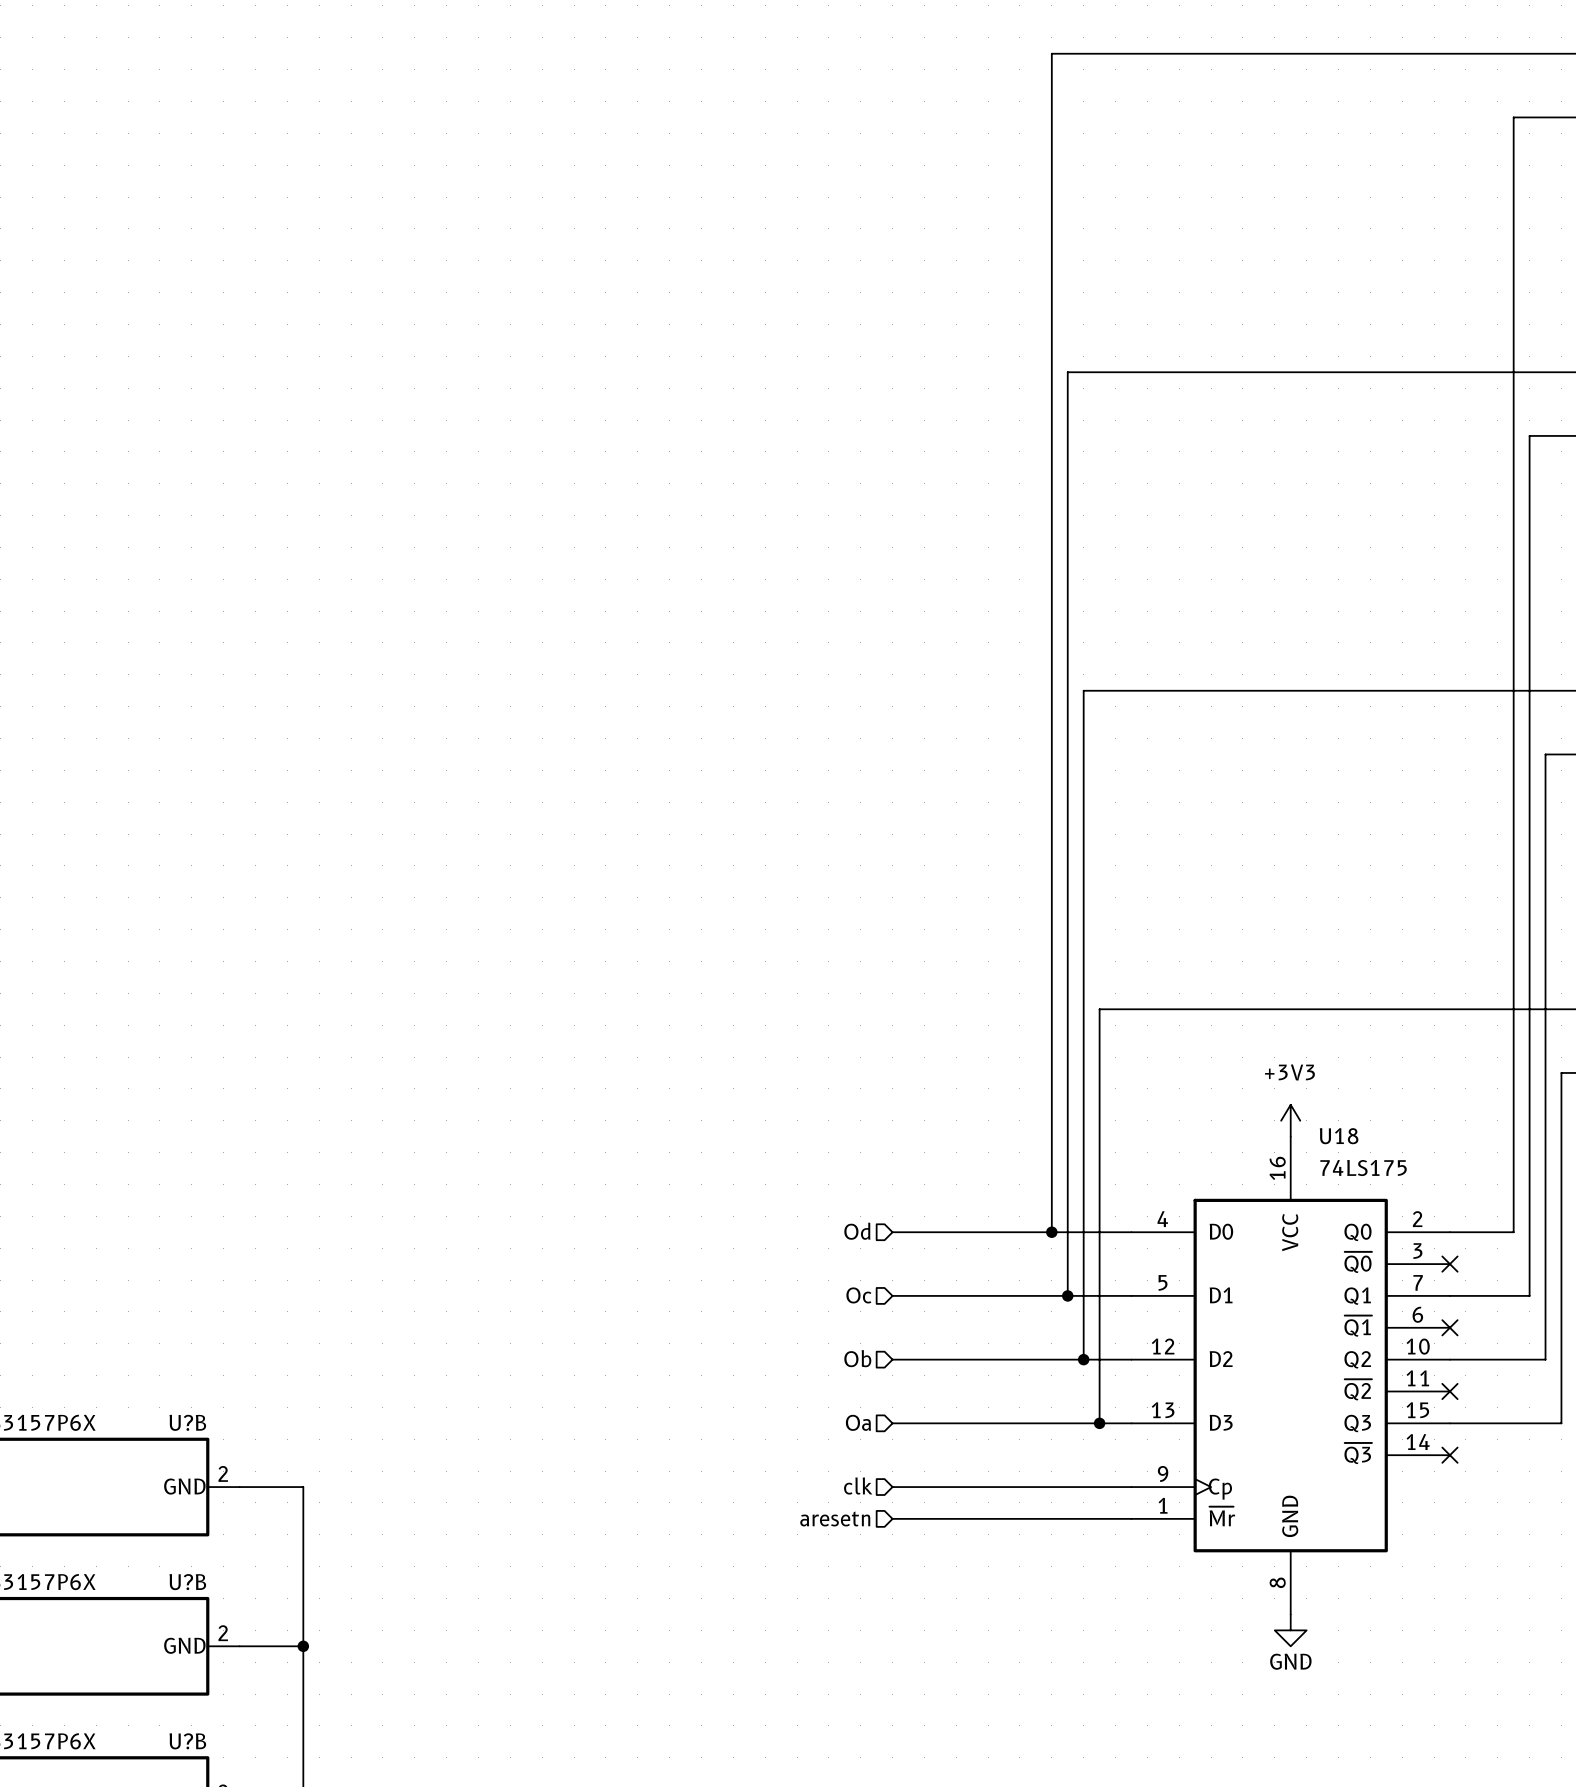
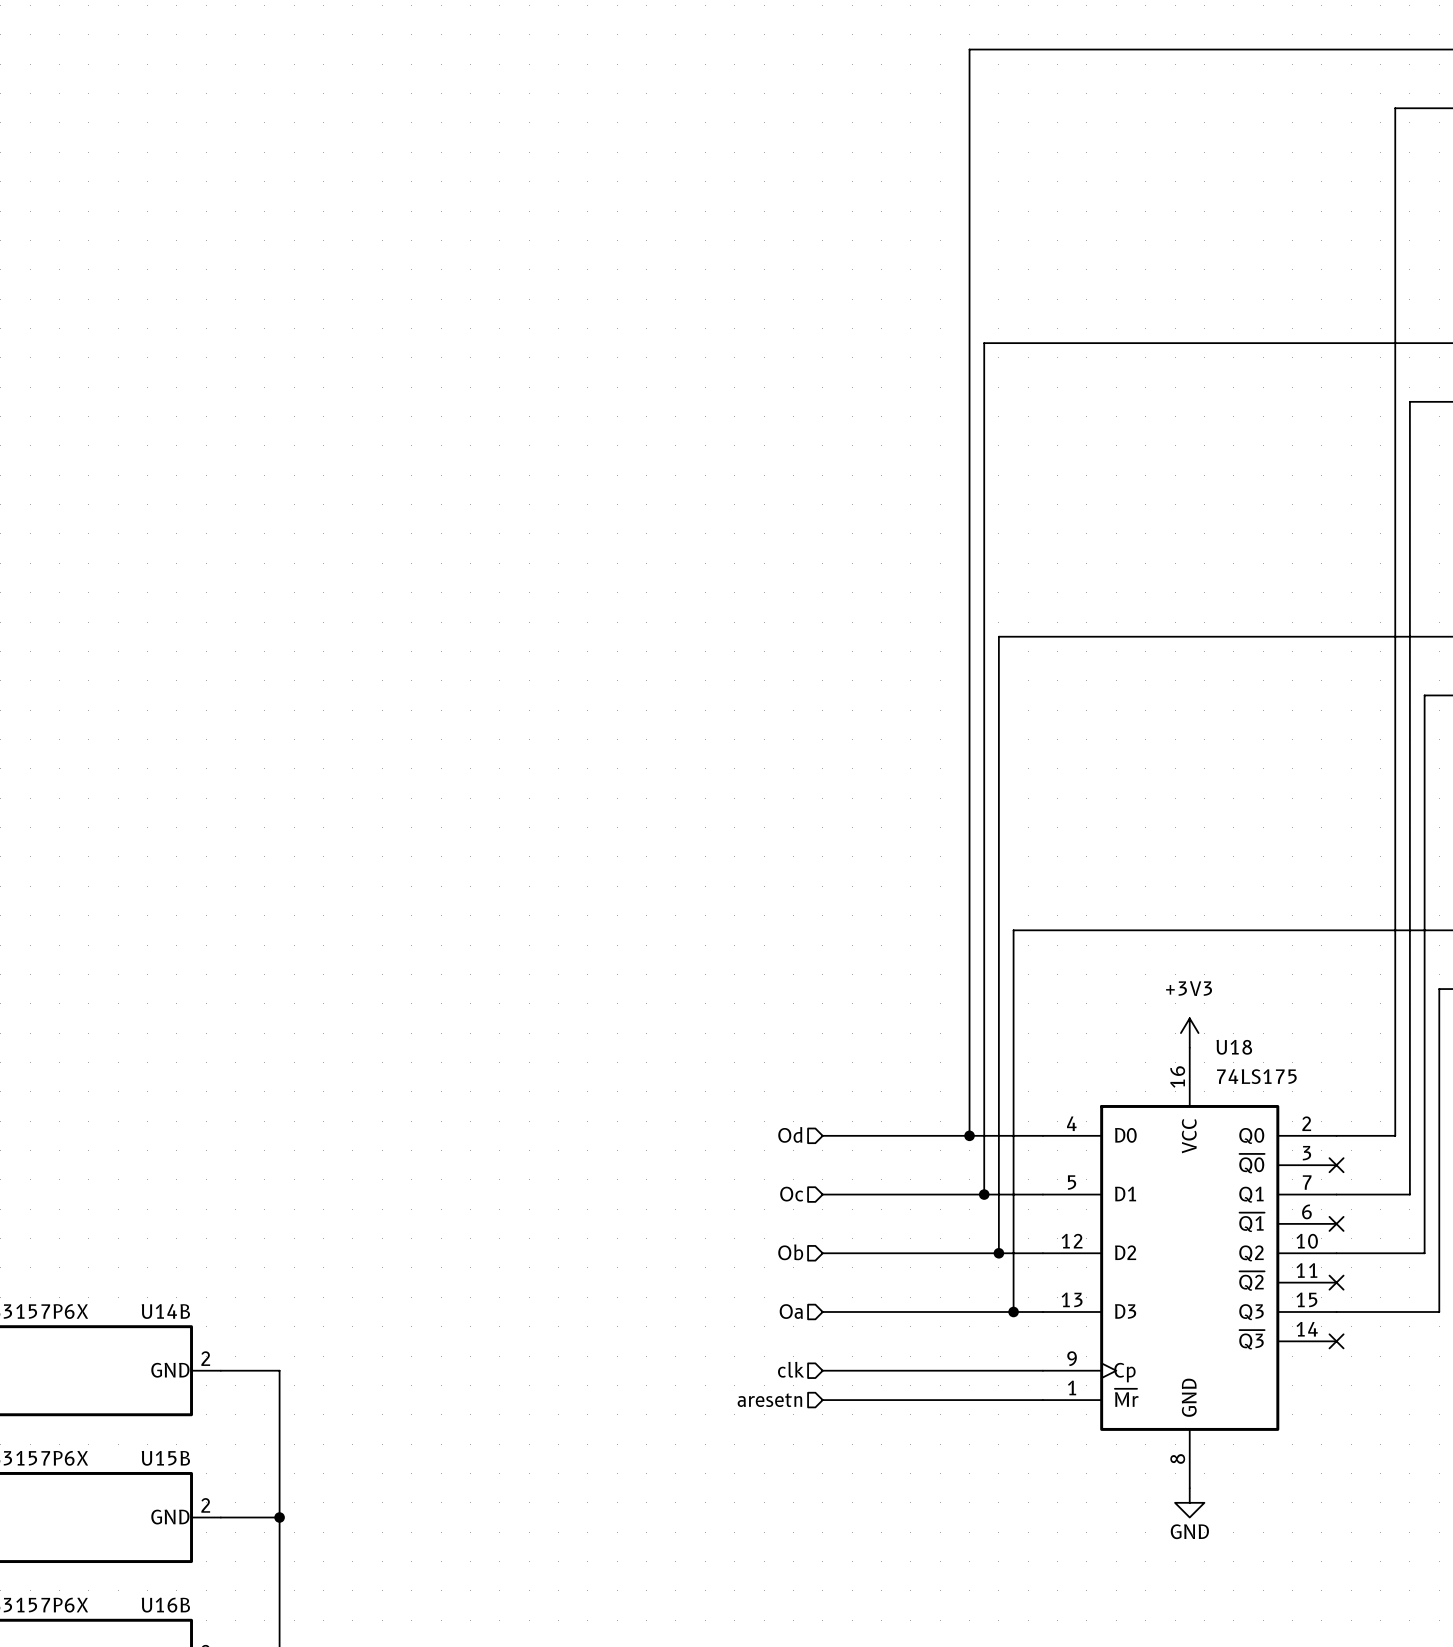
U?B name: U?B (187, 1422) -> U14B (165, 1311)
U?B name: U?B (187, 1582) -> U15B (165, 1458)
U?B name: U?B (187, 1741) -> U16B (165, 1605)

